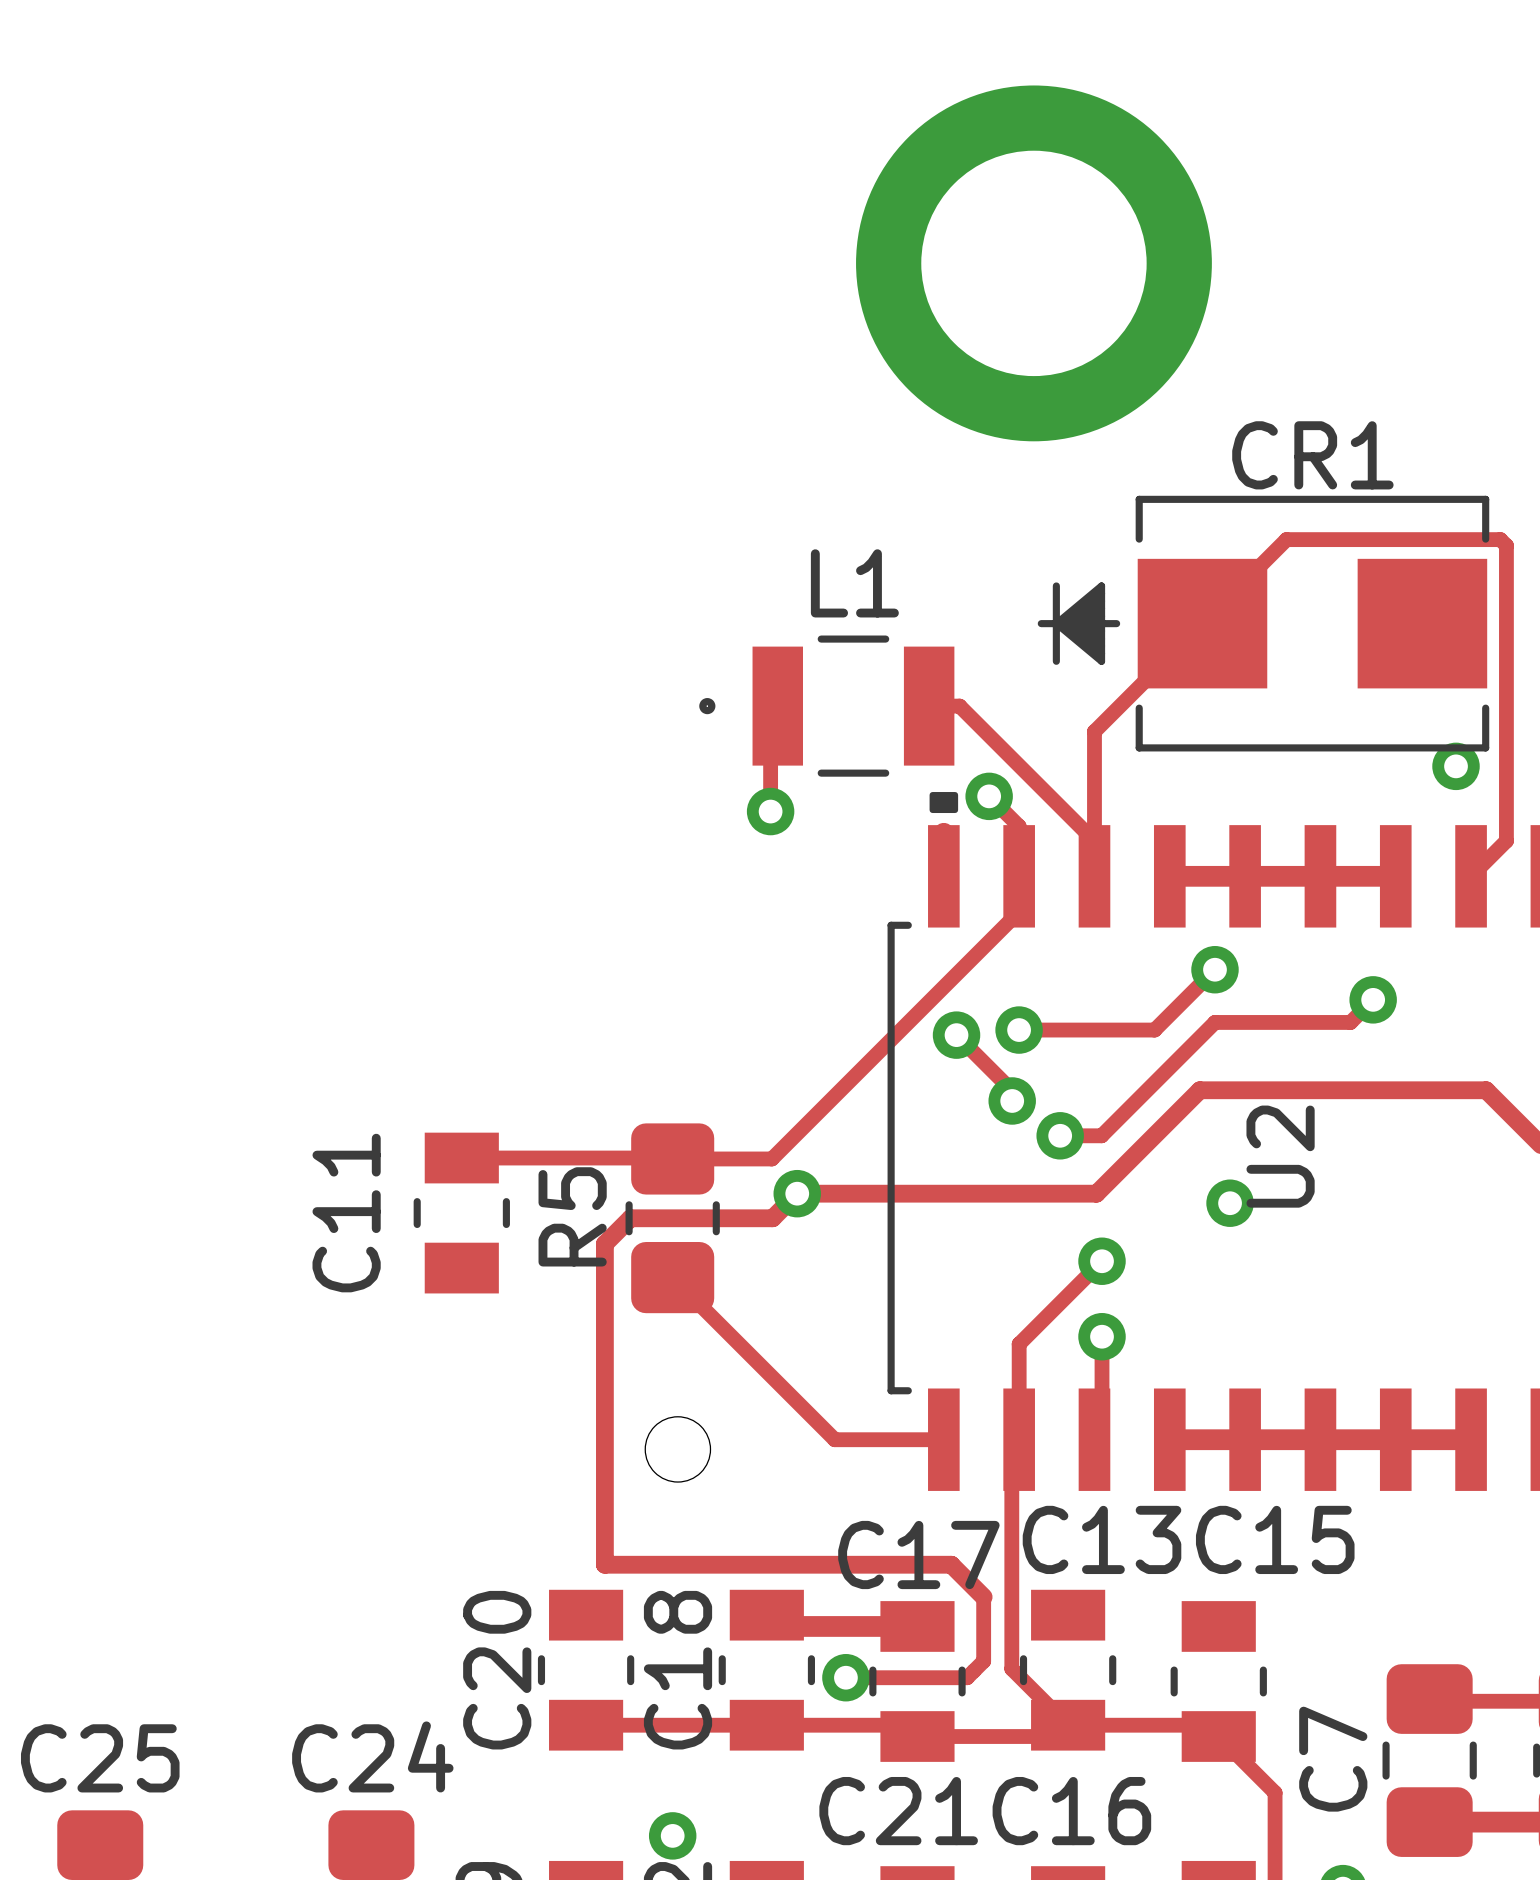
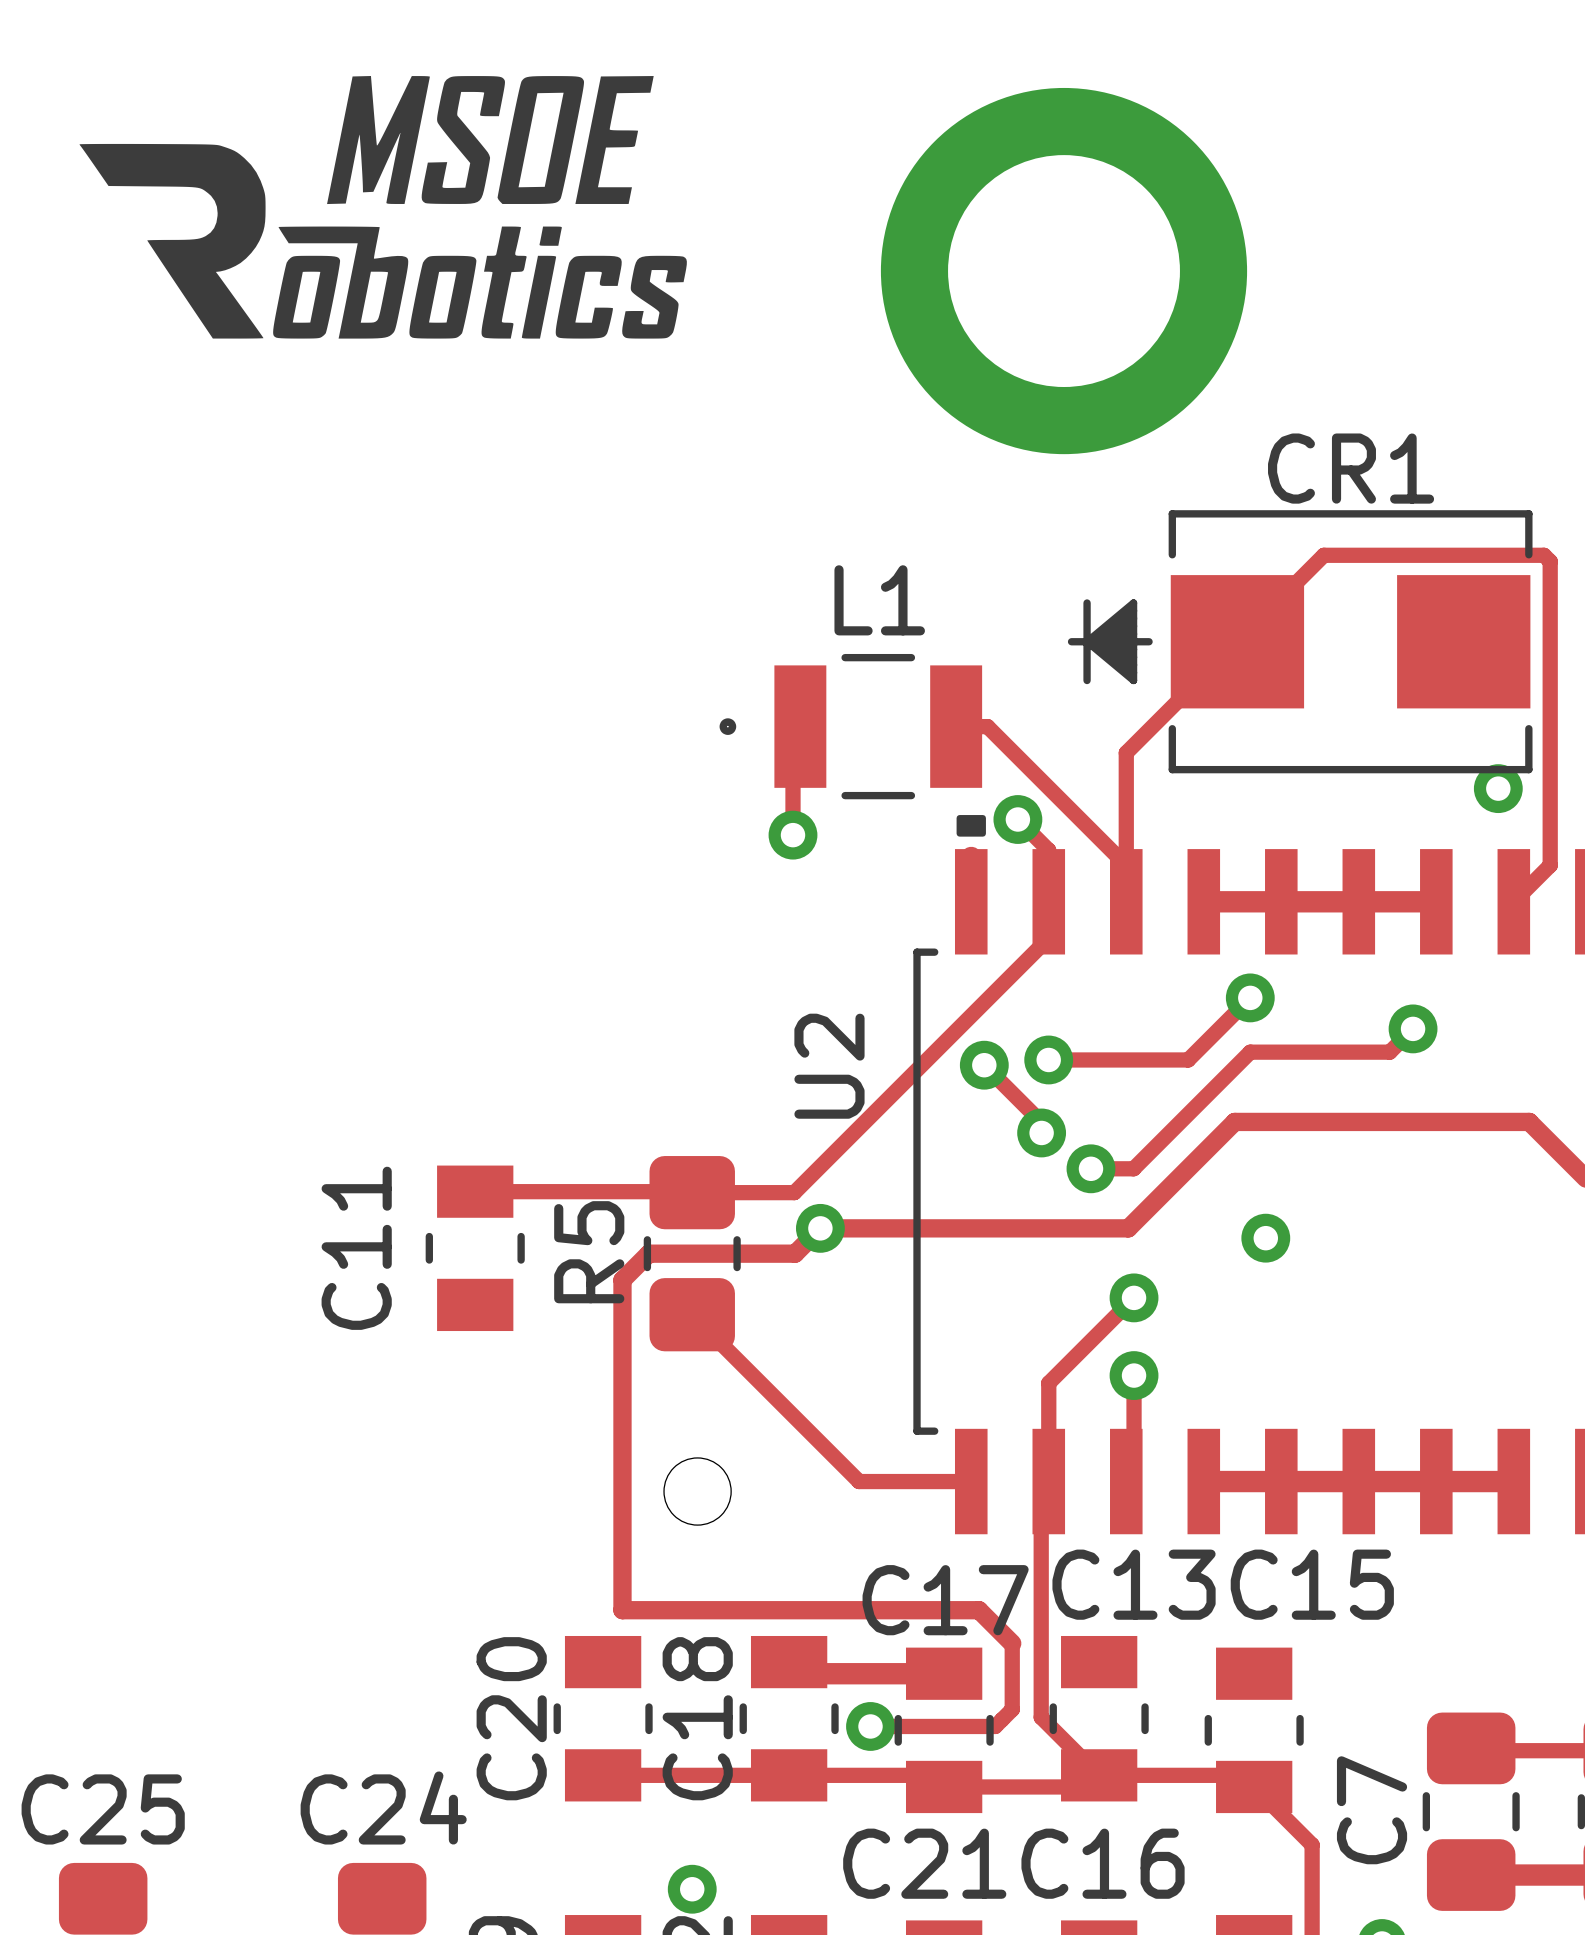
drawing: none -> [79, 75, 687, 339]
U2 name position: U2 (1280, 1156) -> U2 (829, 1066)

